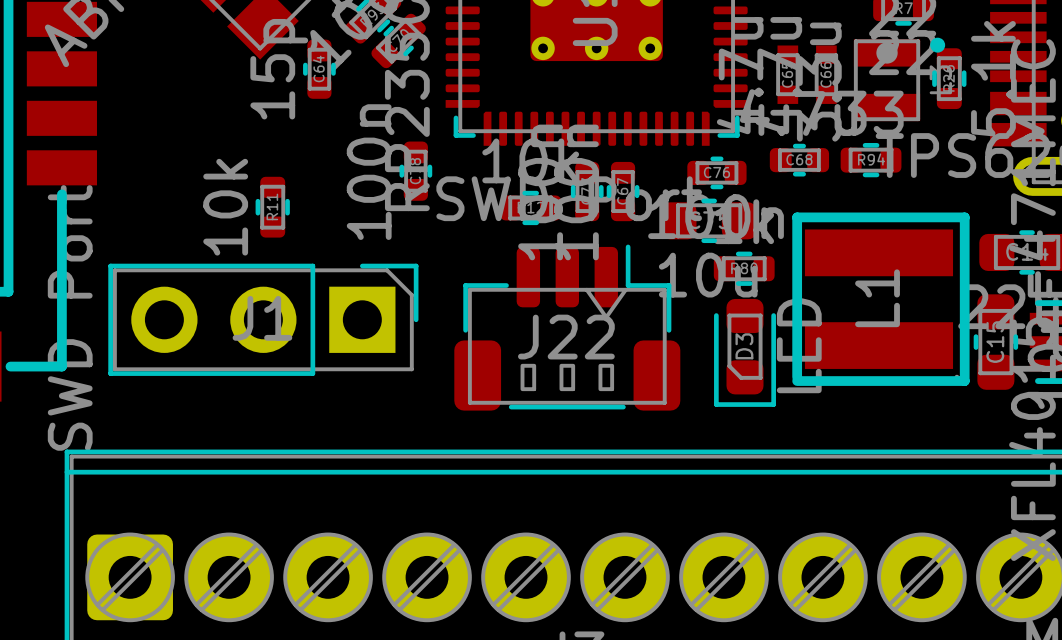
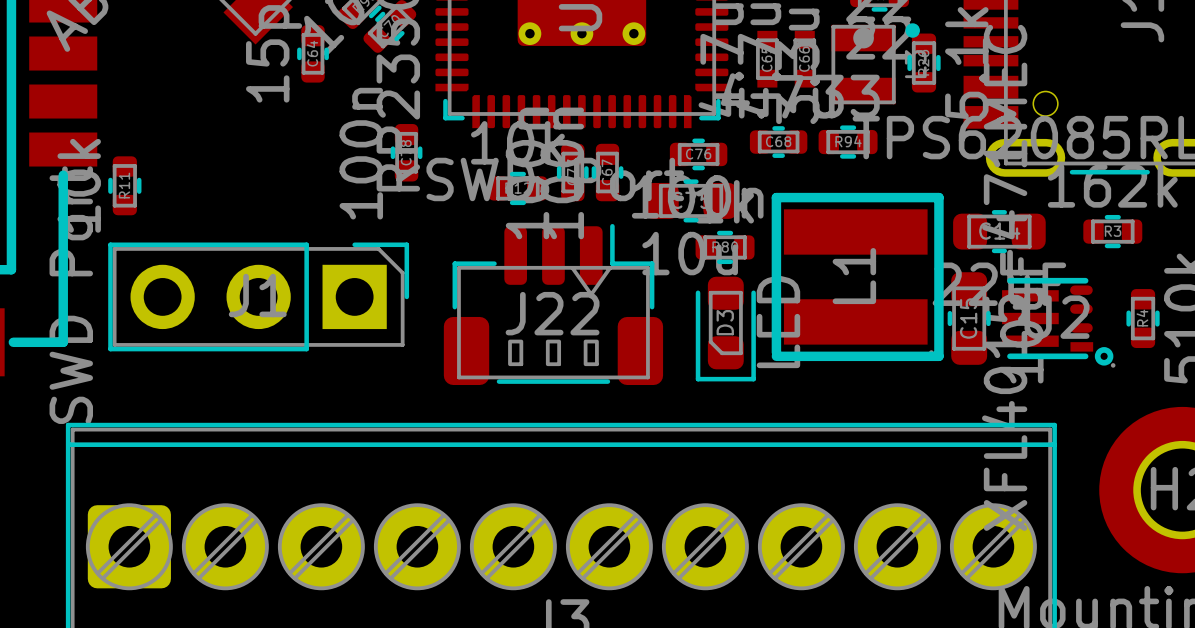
R11 position: (272, 207) -> (124, 185)

